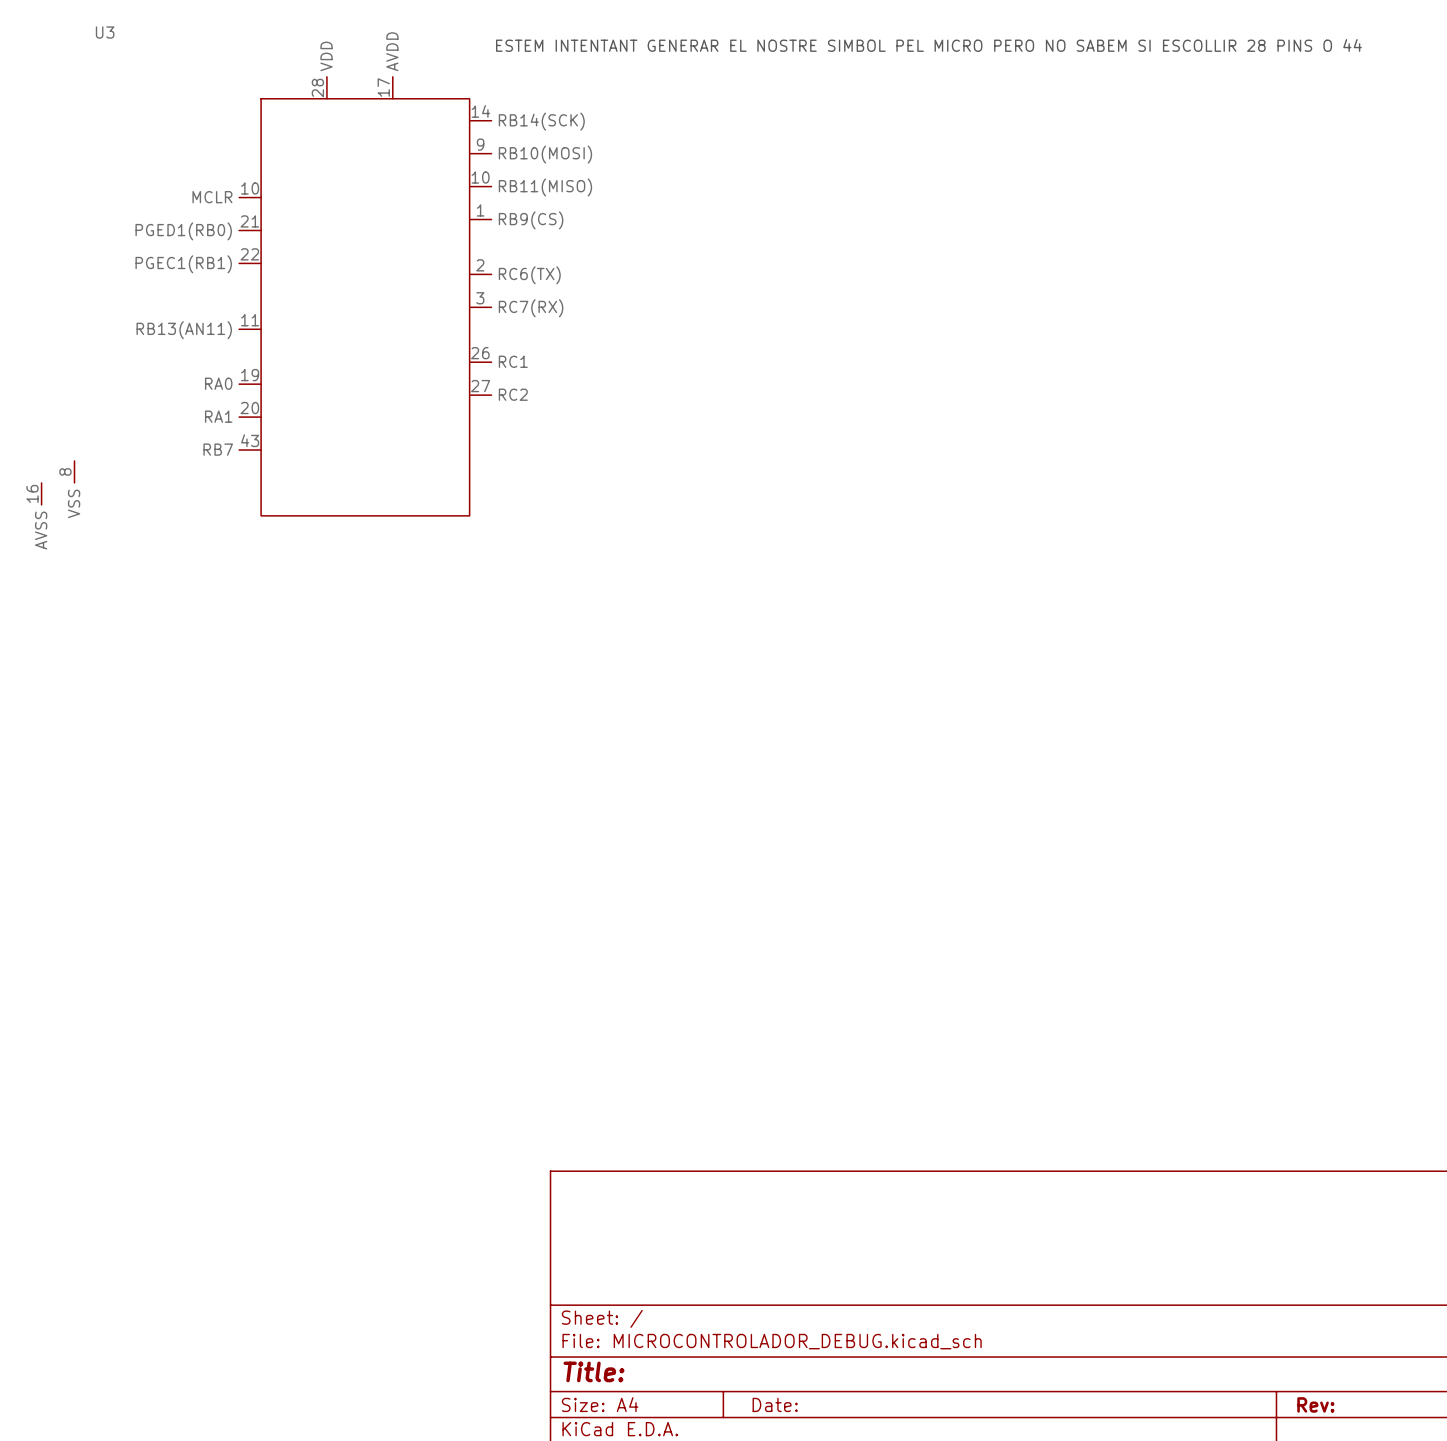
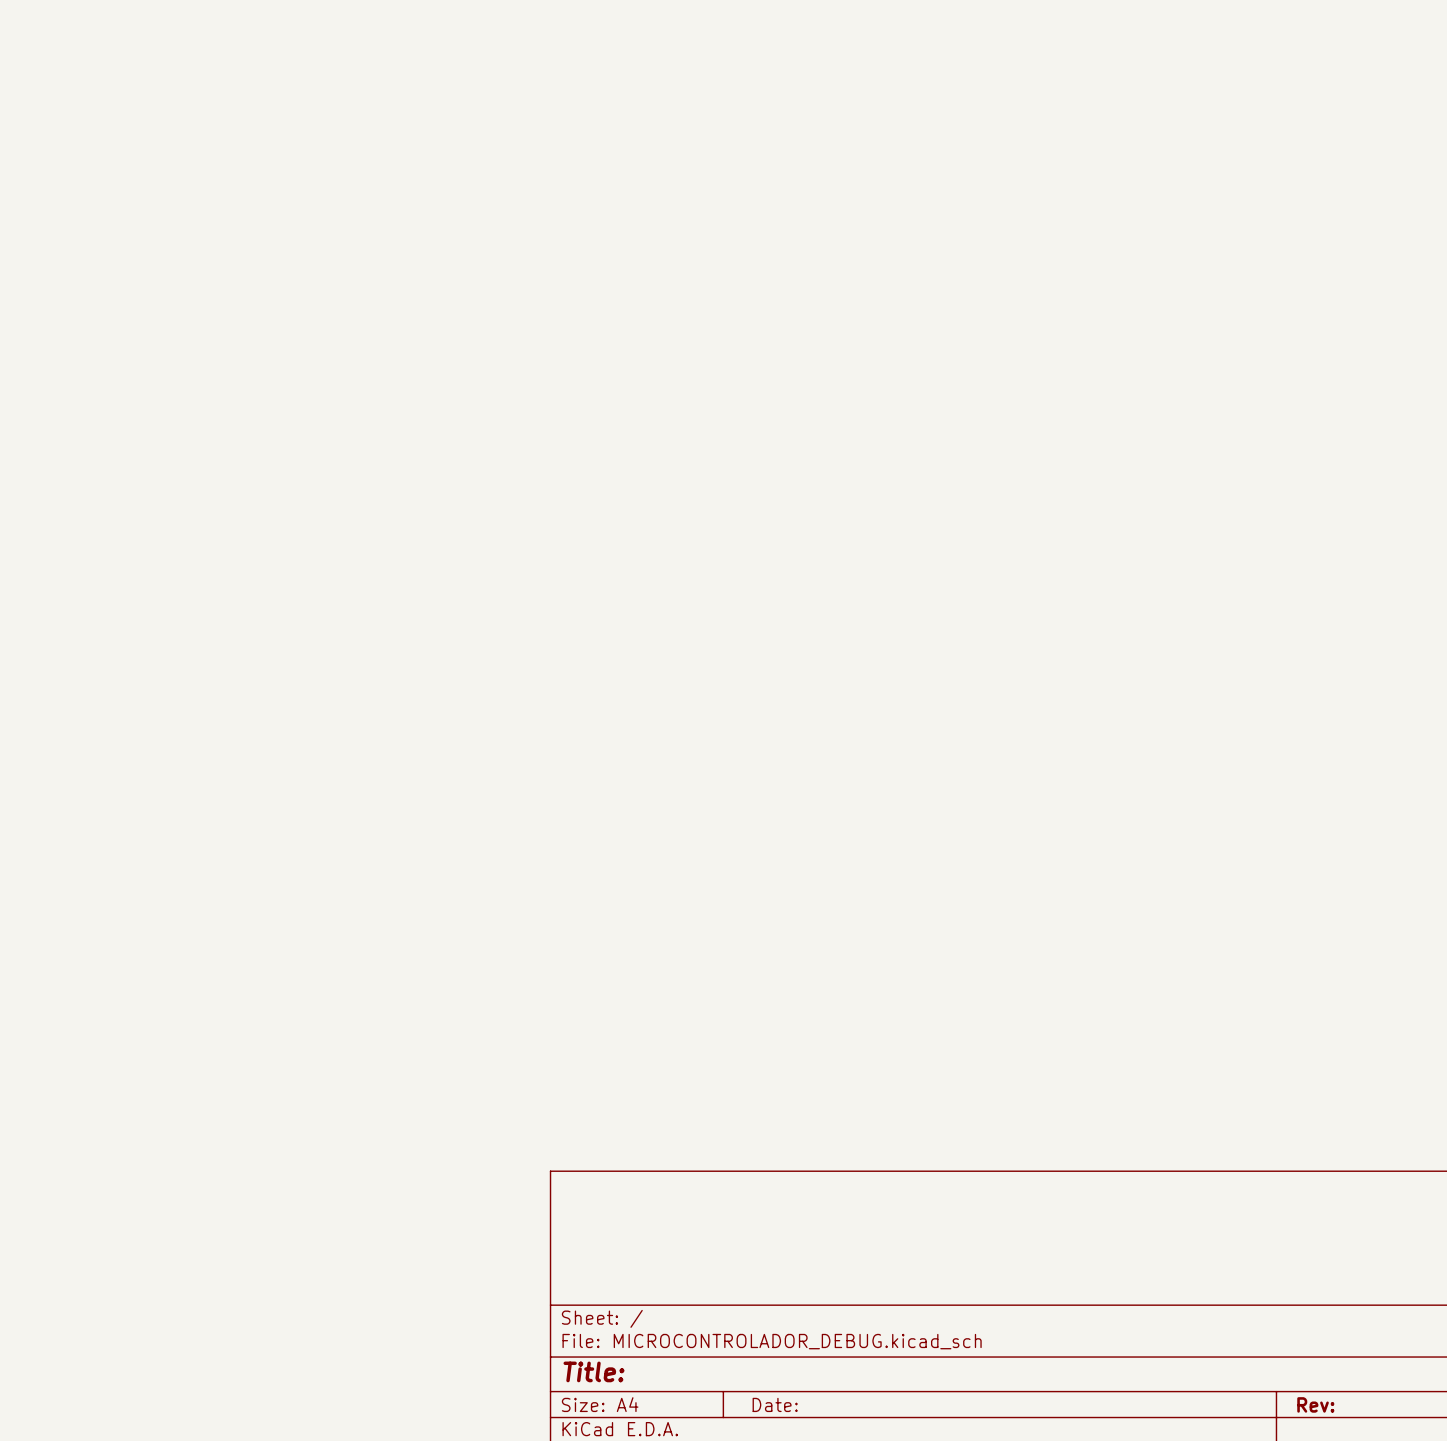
text: ESTEM INTENTANT GENERAR EL NOSTRE SIMBOL PEL MICRO PERO NO SABEM SI ESCOLLIR 28 PINS O 44 (928, 45) -> none
U3: (294, 296) -> none

